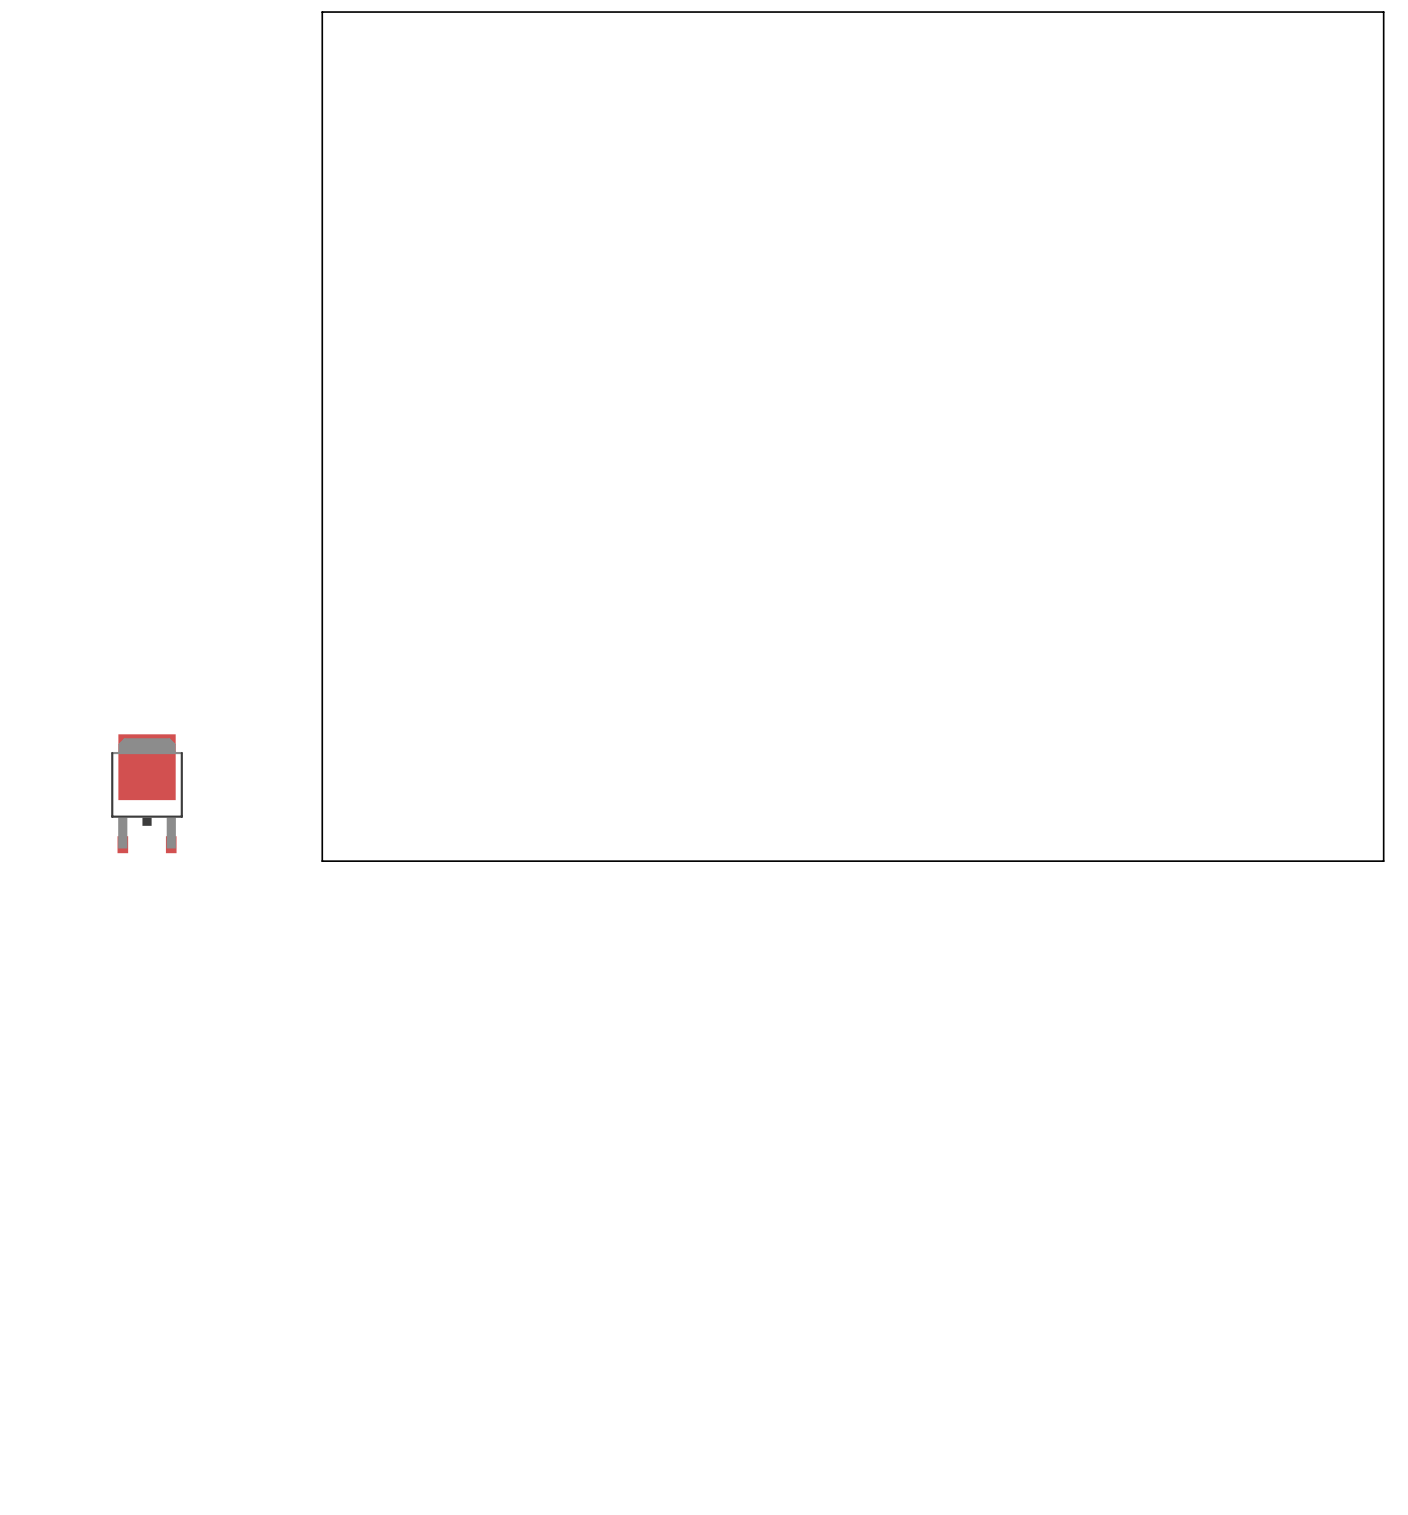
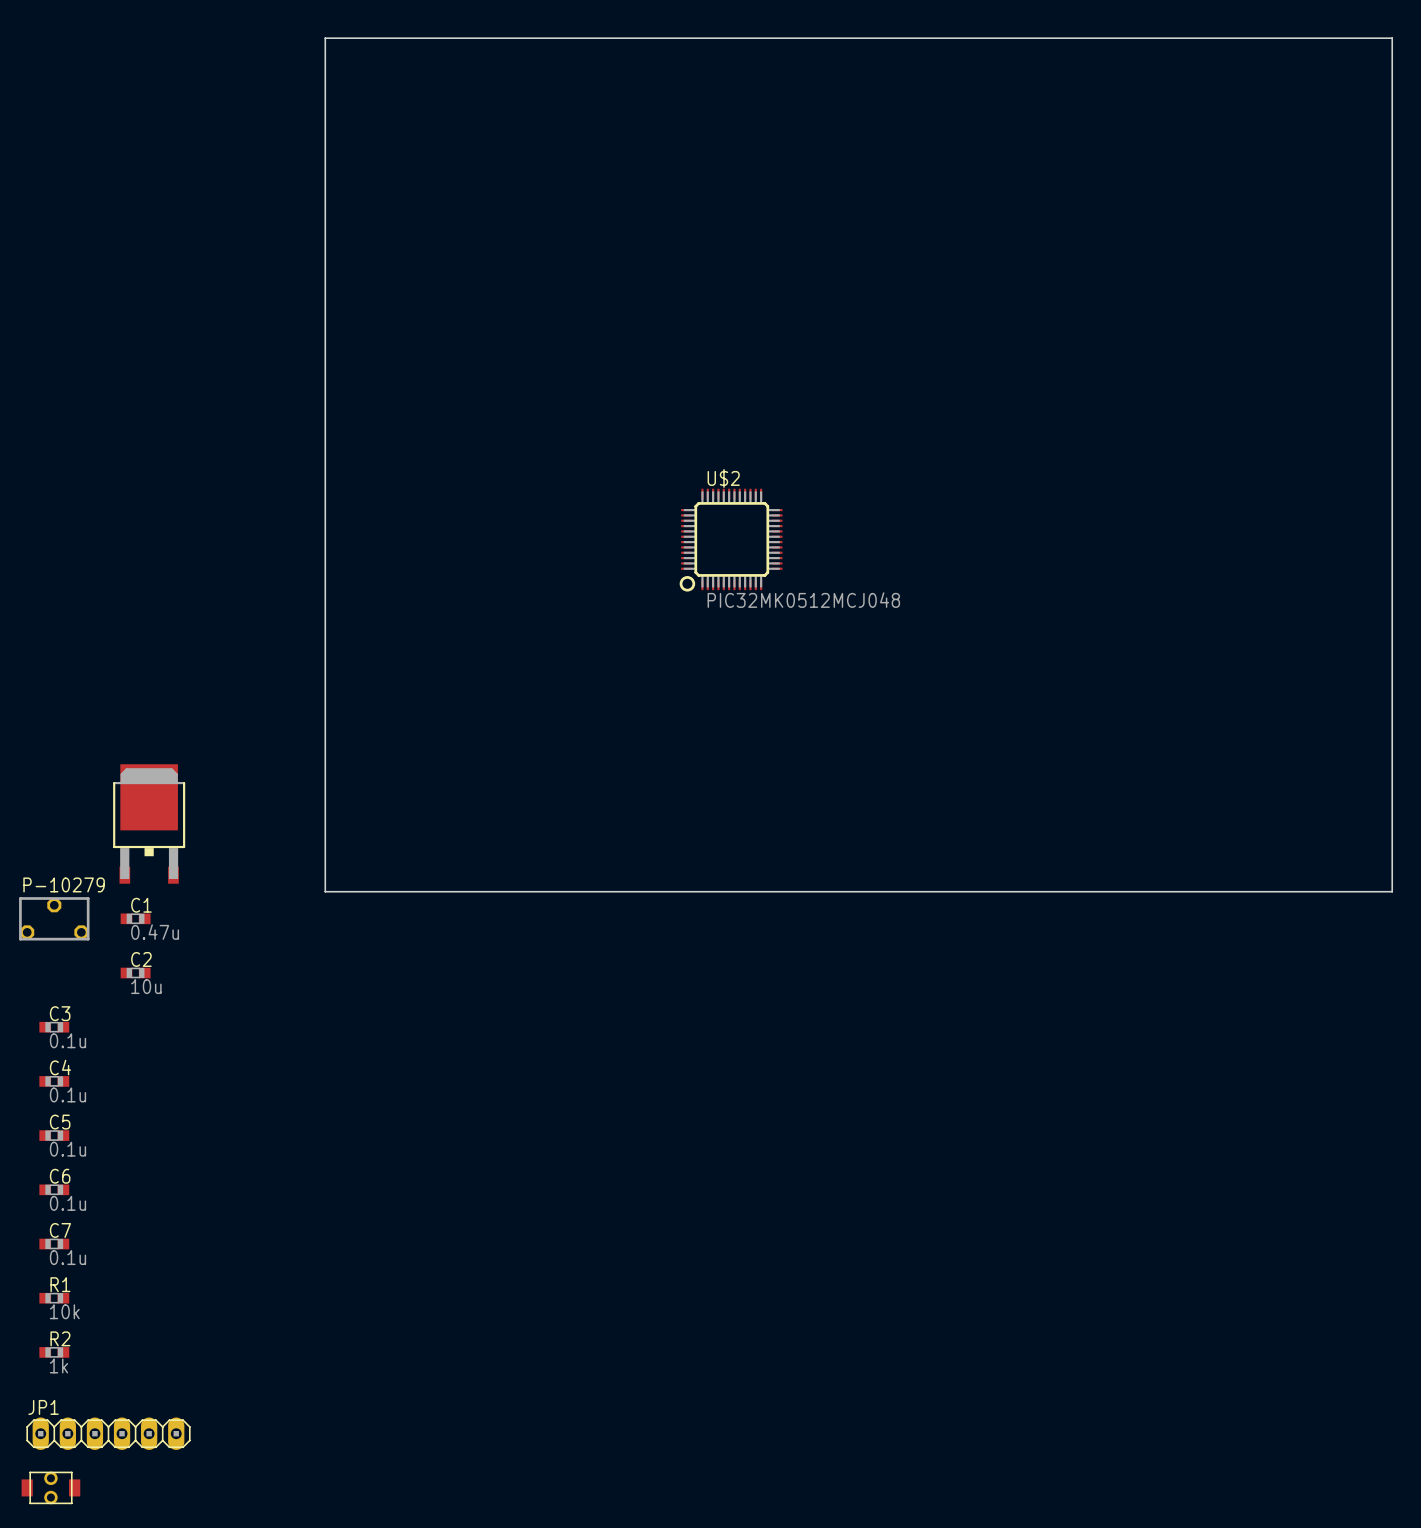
U$2: none -> PIC32MK0512MCJ048 (731, 540)
P-10279: none -> (54, 918)
C1: none -> 0.47u (135, 918)
C2: none -> 10u (135, 973)
C3: none -> 0.1u (54, 1027)
C4: none -> 0.1u (54, 1081)
C5: none -> 0.1u (54, 1135)
C6: none -> 0.1u (54, 1189)
C7: none -> 0.1u (54, 1244)
R1: none -> 10k (54, 1298)
R2: none -> 1k (54, 1352)
JP1: none -> (108, 1433)
part: none -> (50, 1487)

